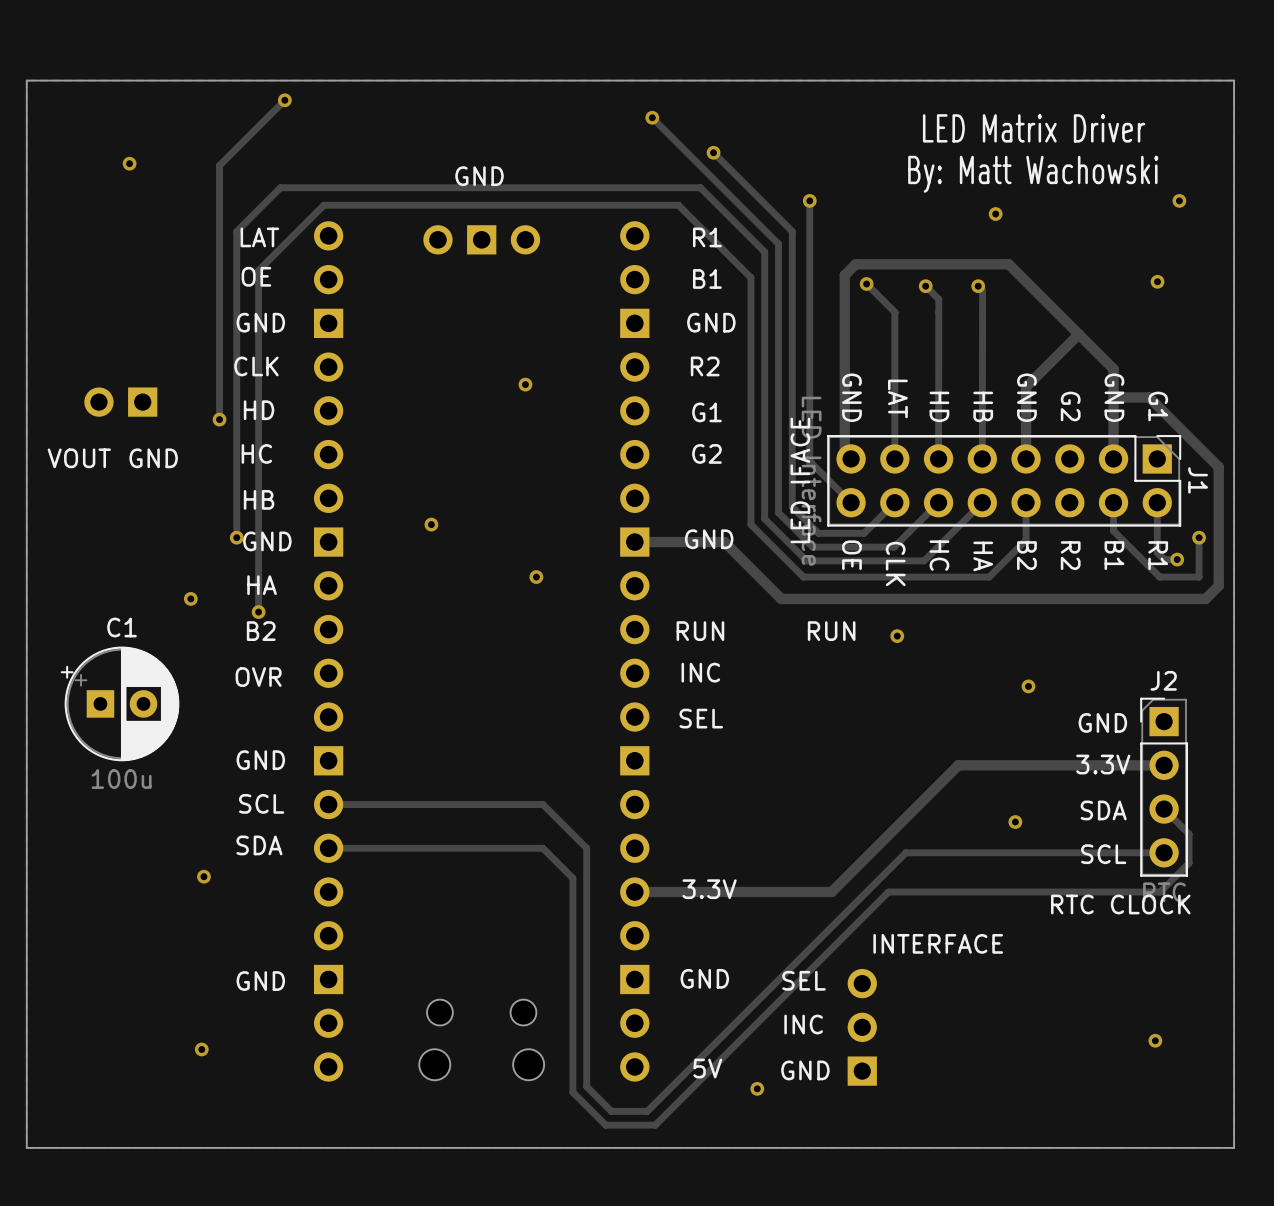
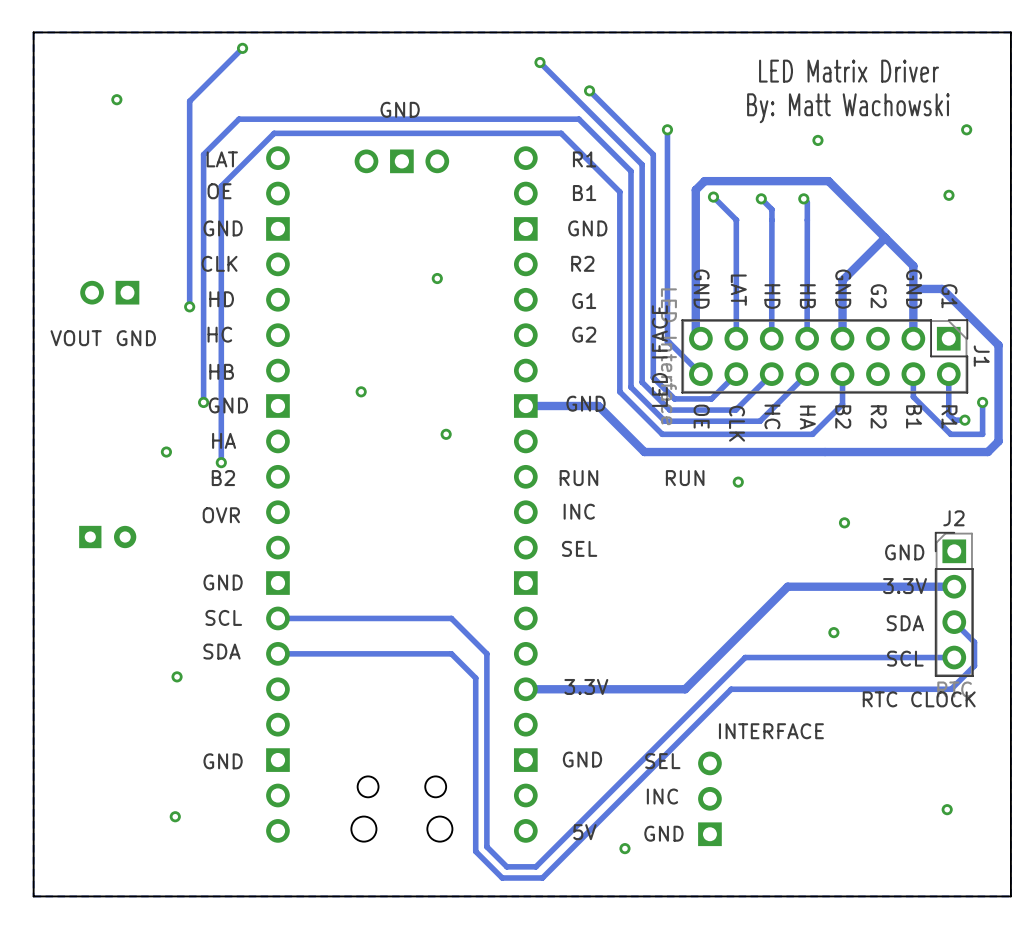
part: none -> (107, 537)
C1: 100u (120, 703) -> none

